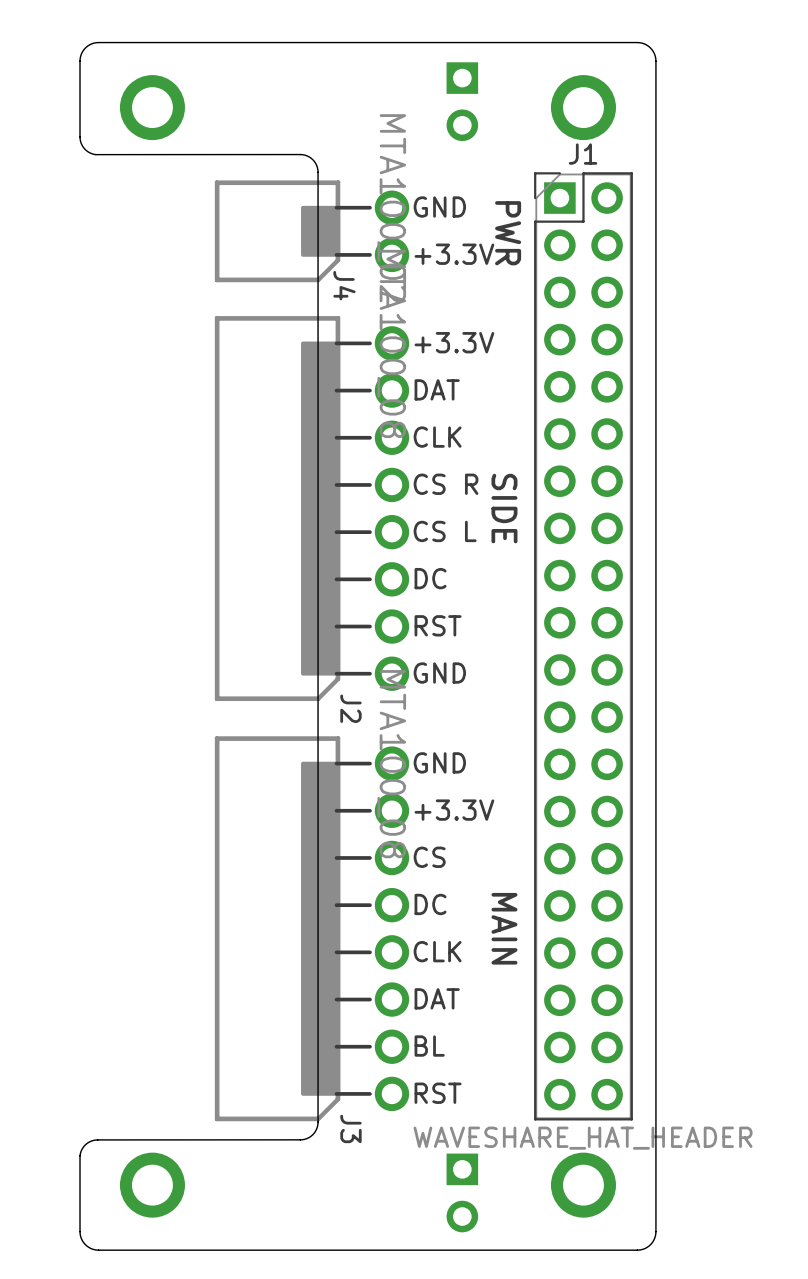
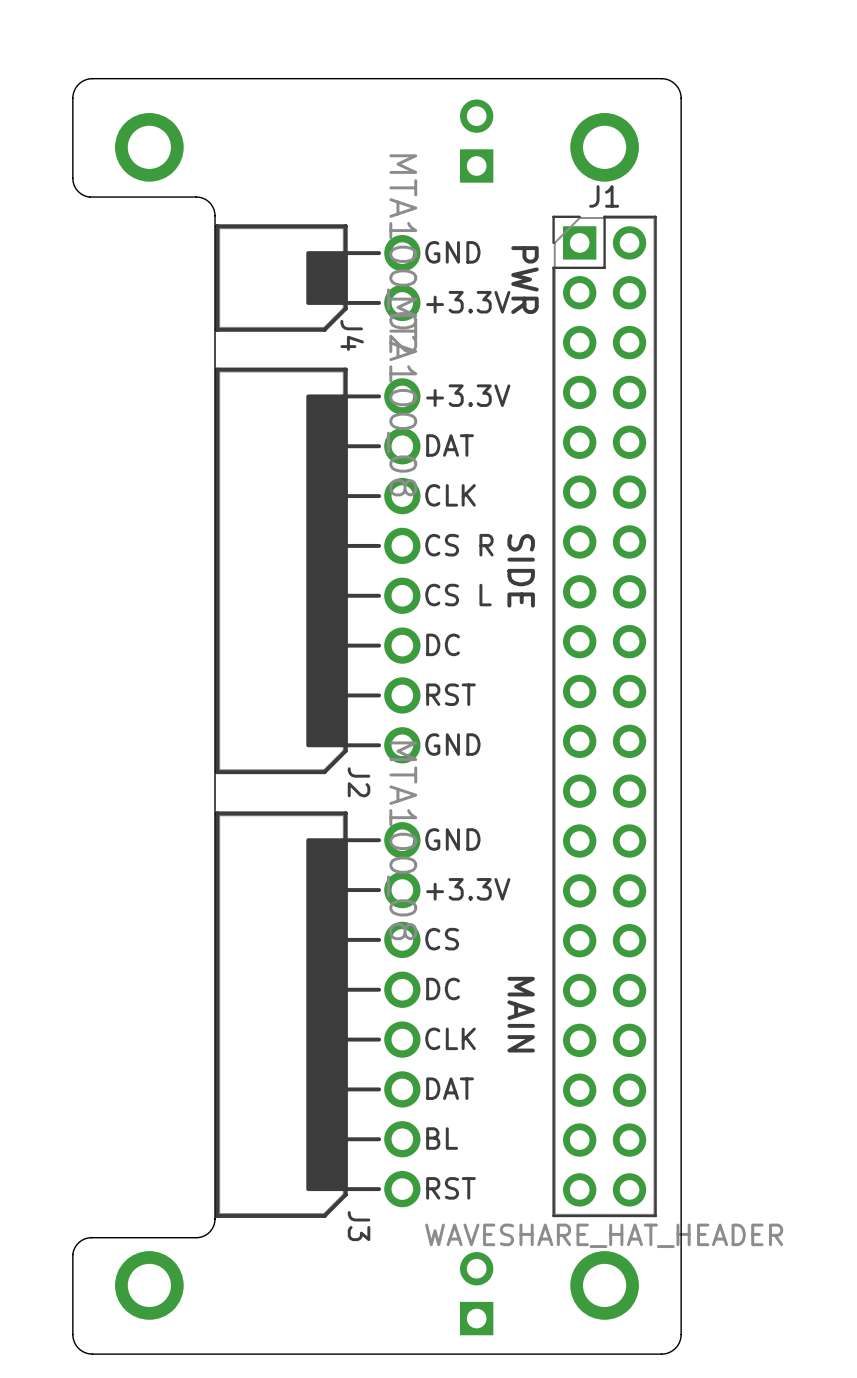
part rotation: 0° (462, 101) -> 180° (476, 141)
board edge: (95, 154) (302, 154) (314, 161) (318, 172) (317, 1126) (311, 1135) (302, 1139) (97, 1139) -> (89, 197) (198, 197) (209, 202) (215, 215) (214, 1221) (209, 1232) (198, 1237) (91, 1237)
J4 footprint: [214, 180, 410, 283] -> [215, 224, 421, 332]
J2 footprint: [214, 316, 410, 702] -> [215, 367, 421, 775]
J3 footprint: [214, 736, 410, 1122] -> [215, 811, 421, 1218]
part rotation: 0° (462, 1192) -> 180° (476, 1293)

